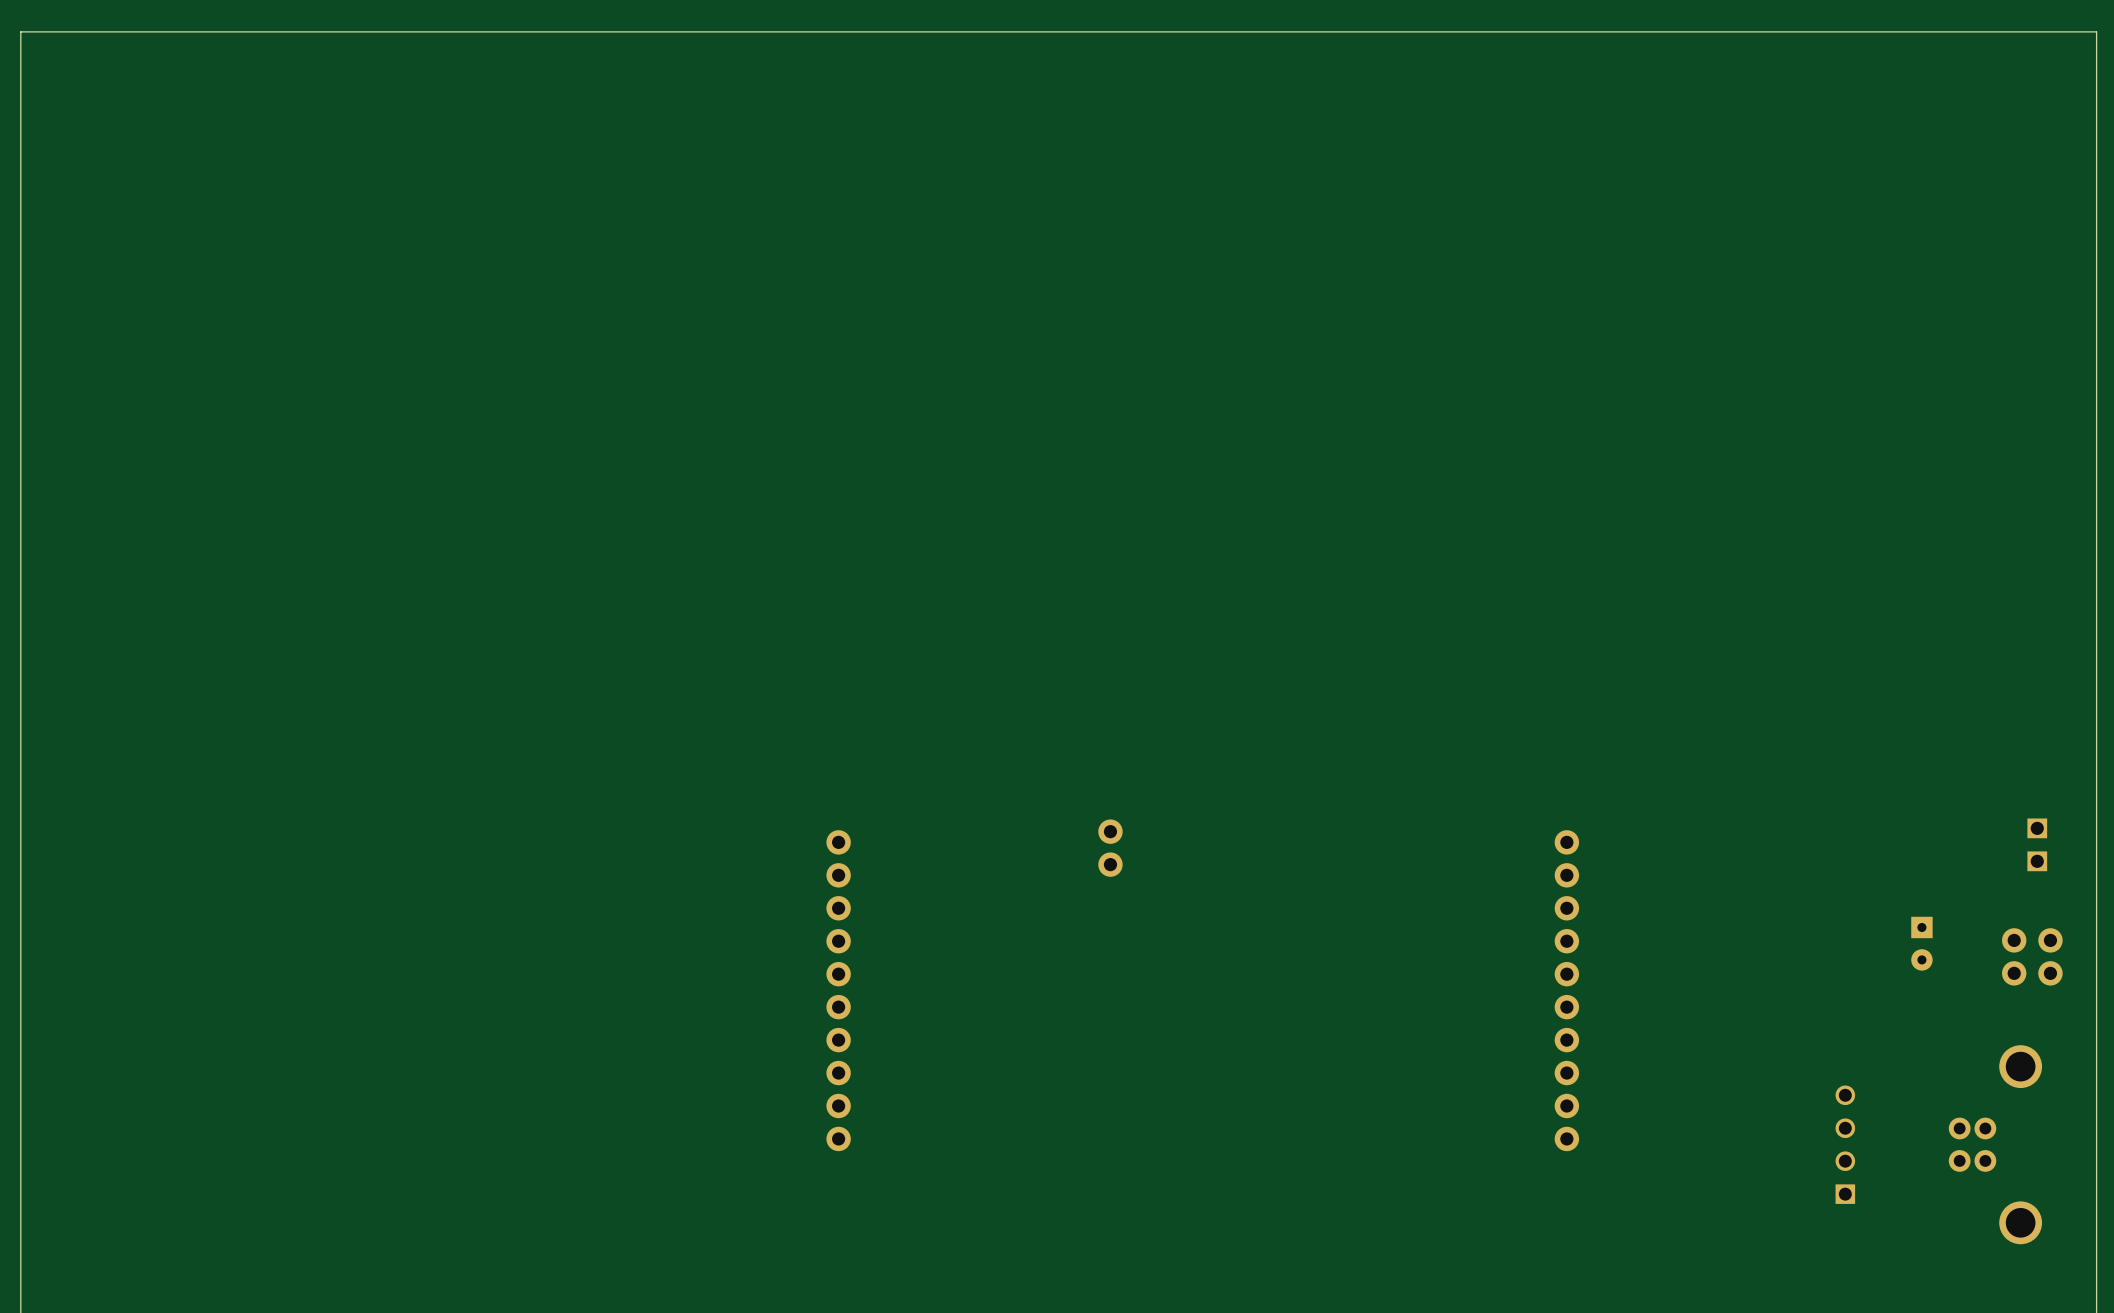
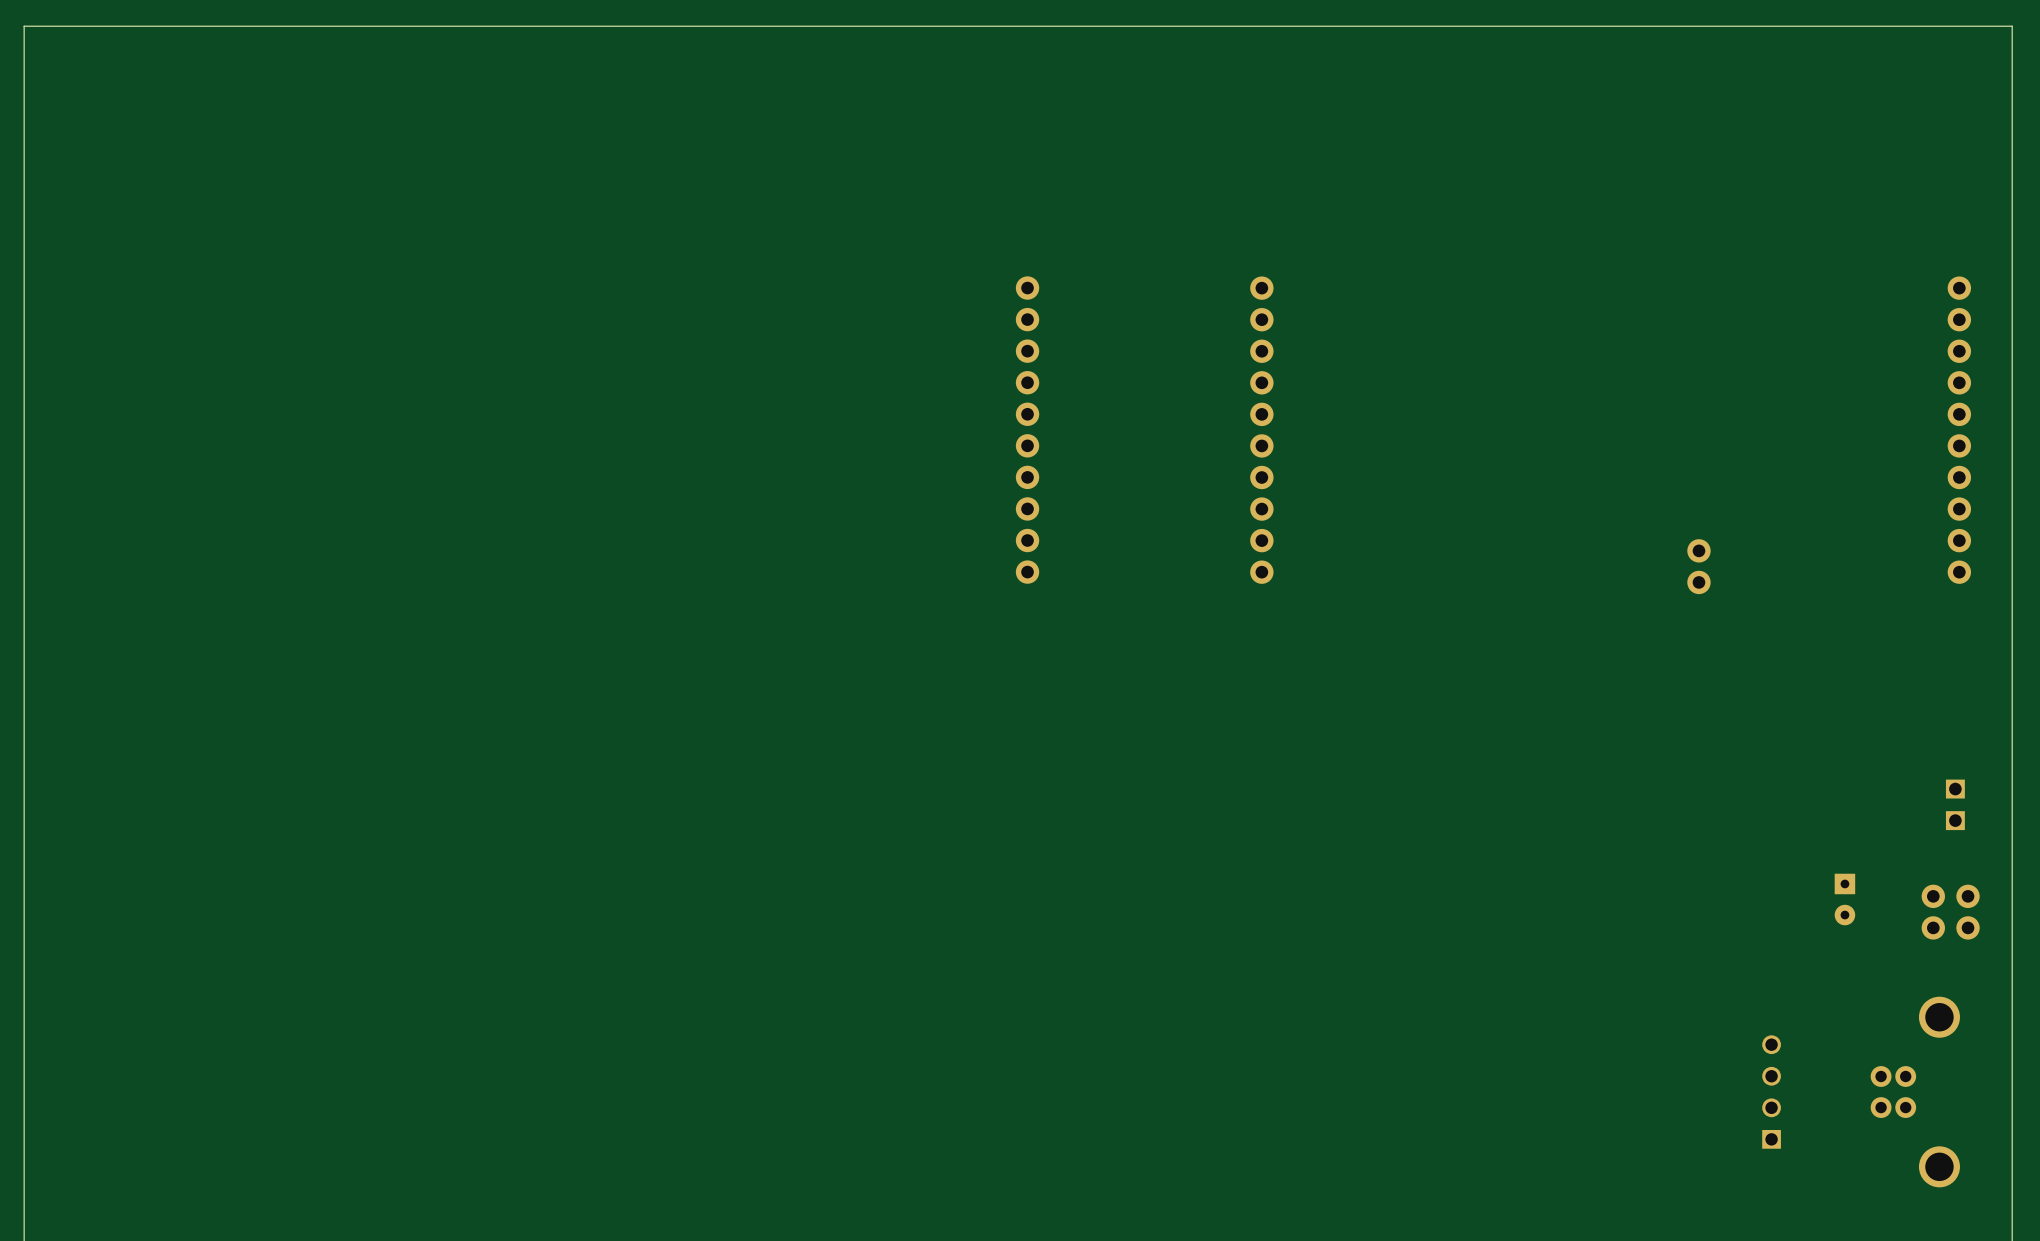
part: none -> (1027, 430)
part: none -> (1261, 430)
part: none -> (1959, 430)
part: none -> (1698, 566)
part: (1110, 848) -> none
part: (838, 990) -> none
part: (1566, 990) -> none

